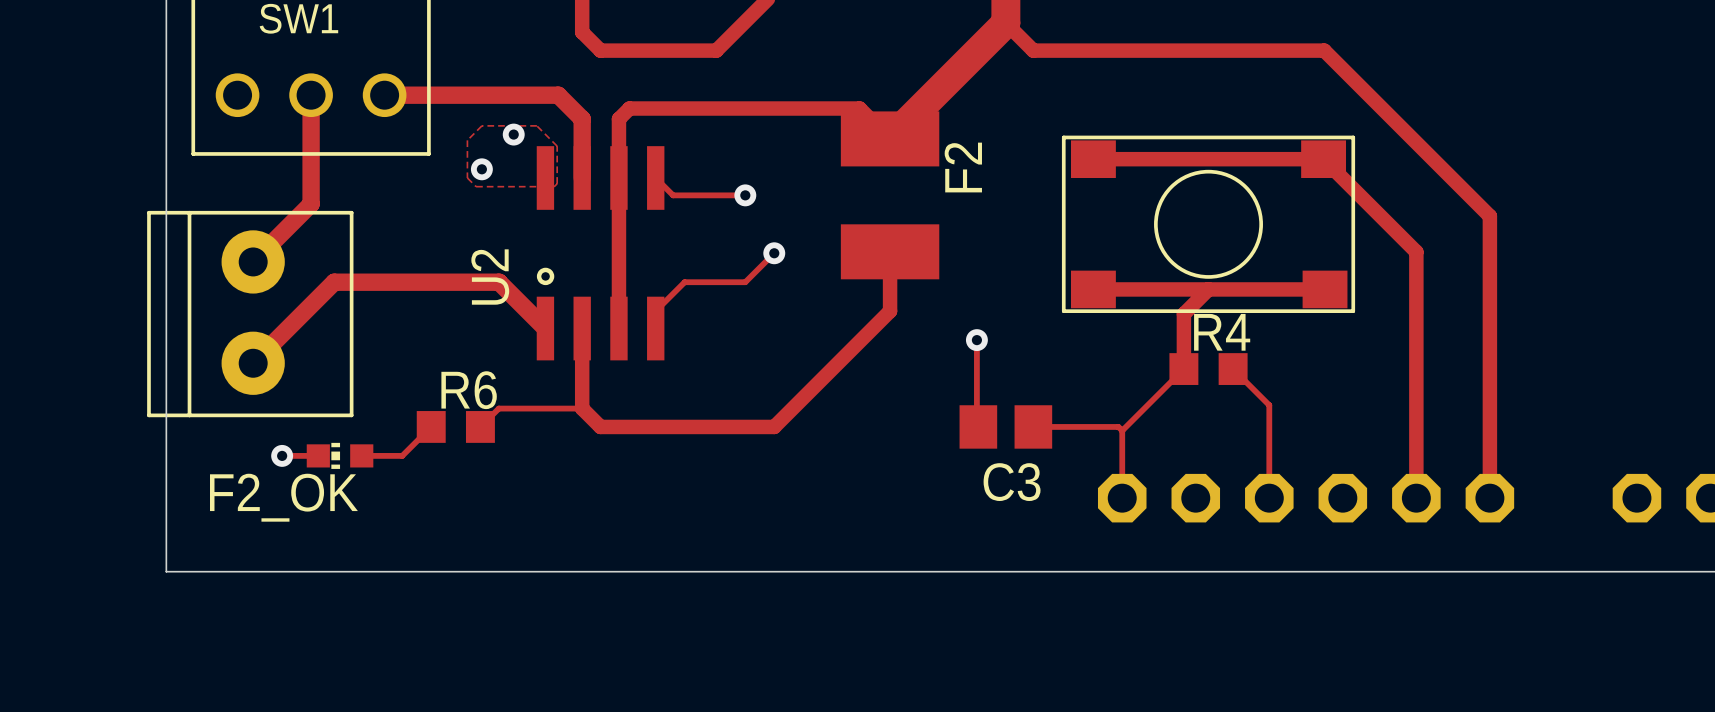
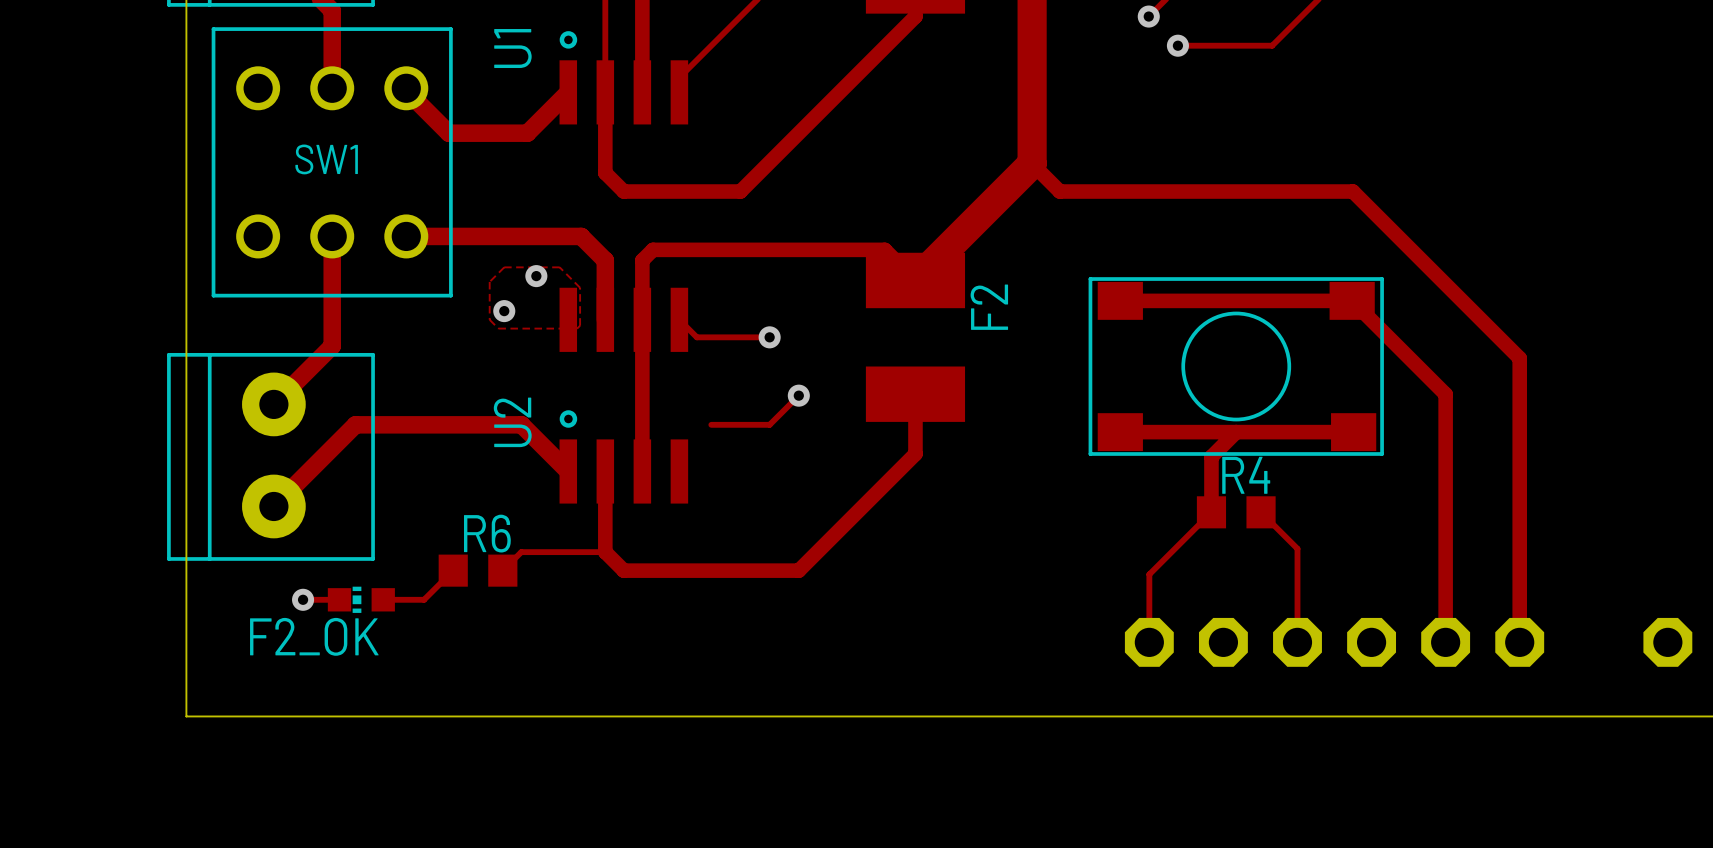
track: (687, 282) (684, 282) (655, 311) -> none
track: (976, 340) (978, 426) -> none
via: (976, 340) -> none
C3: (1005, 426) -> none
track: (1033, 426) (1118, 426) (1122, 430) -> none

